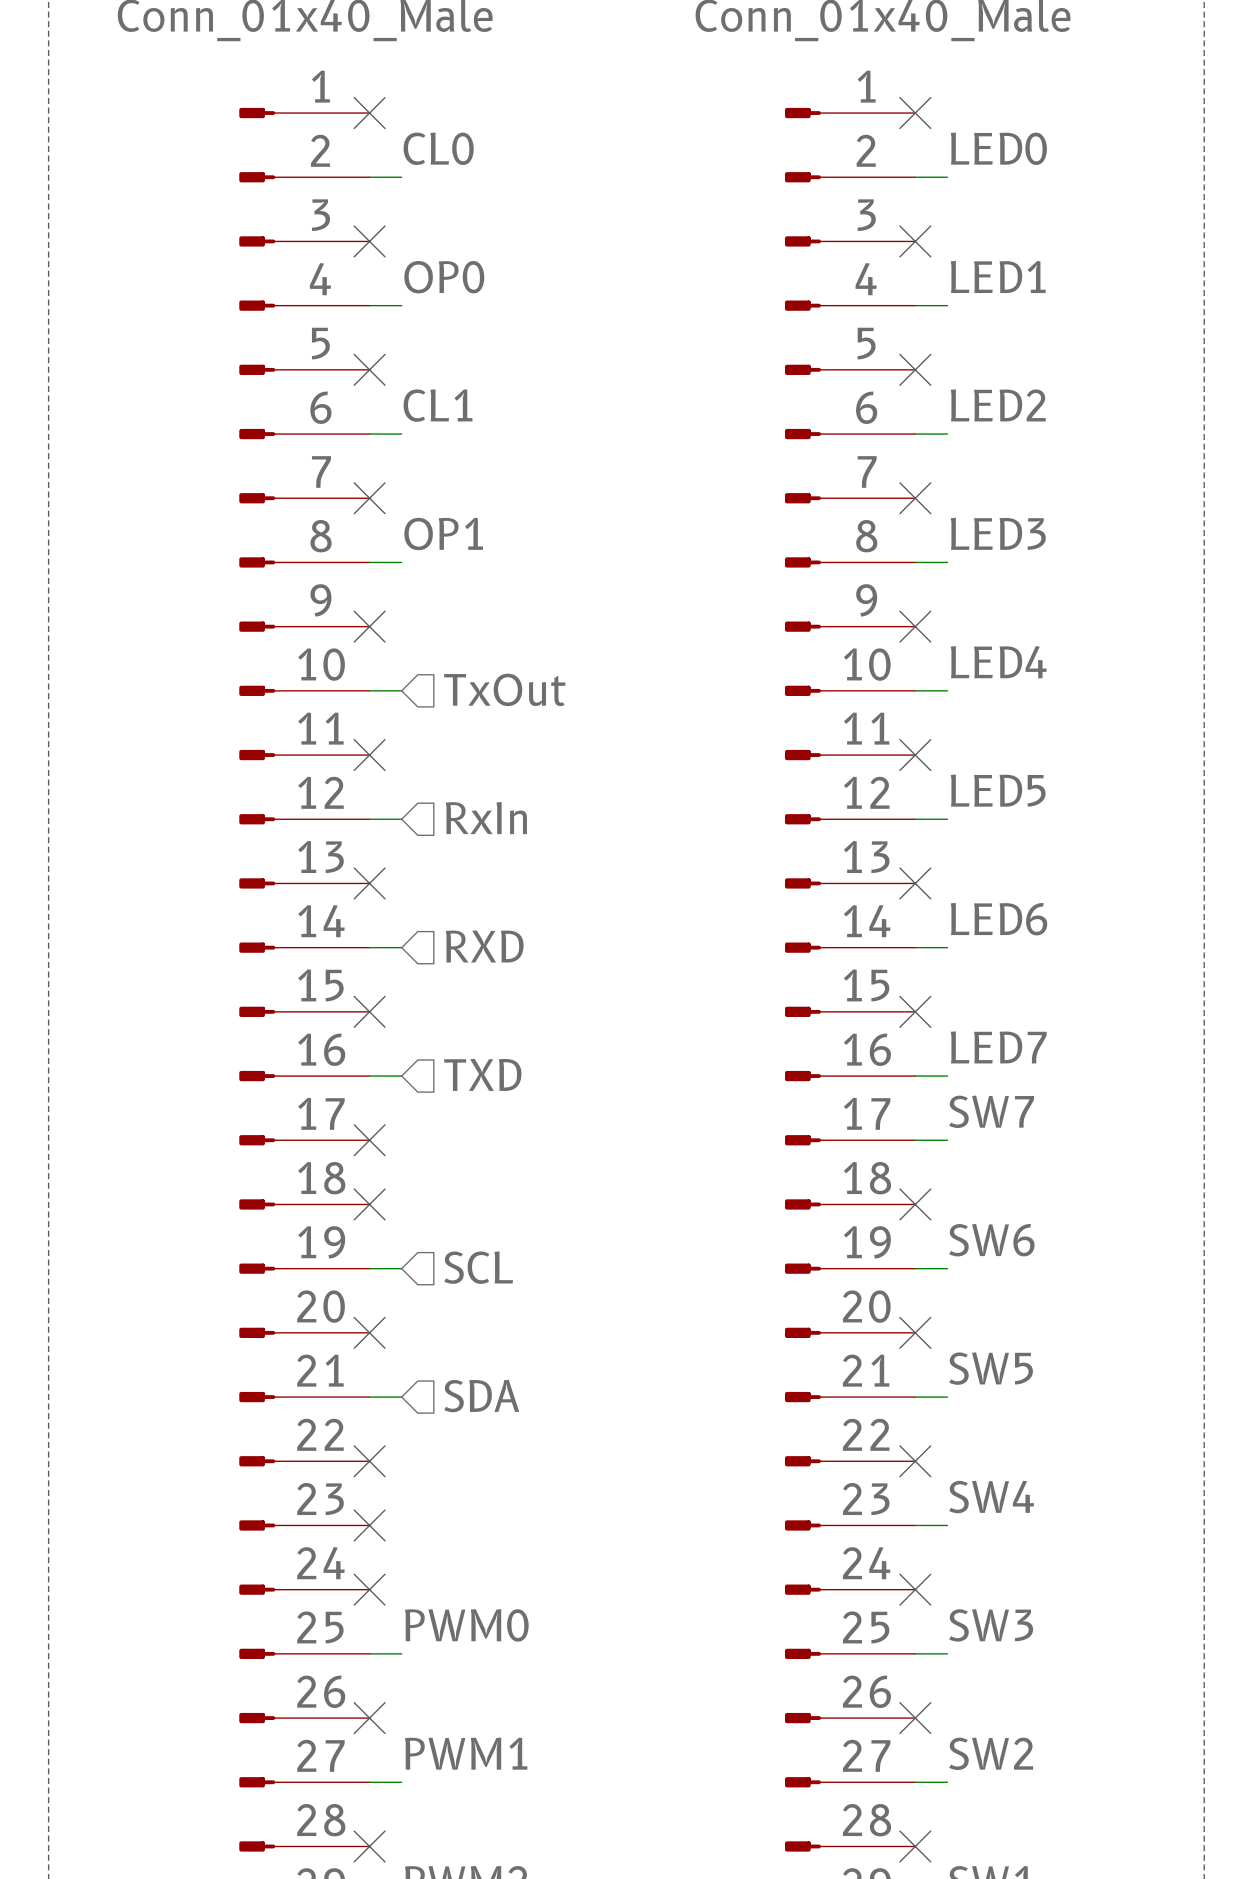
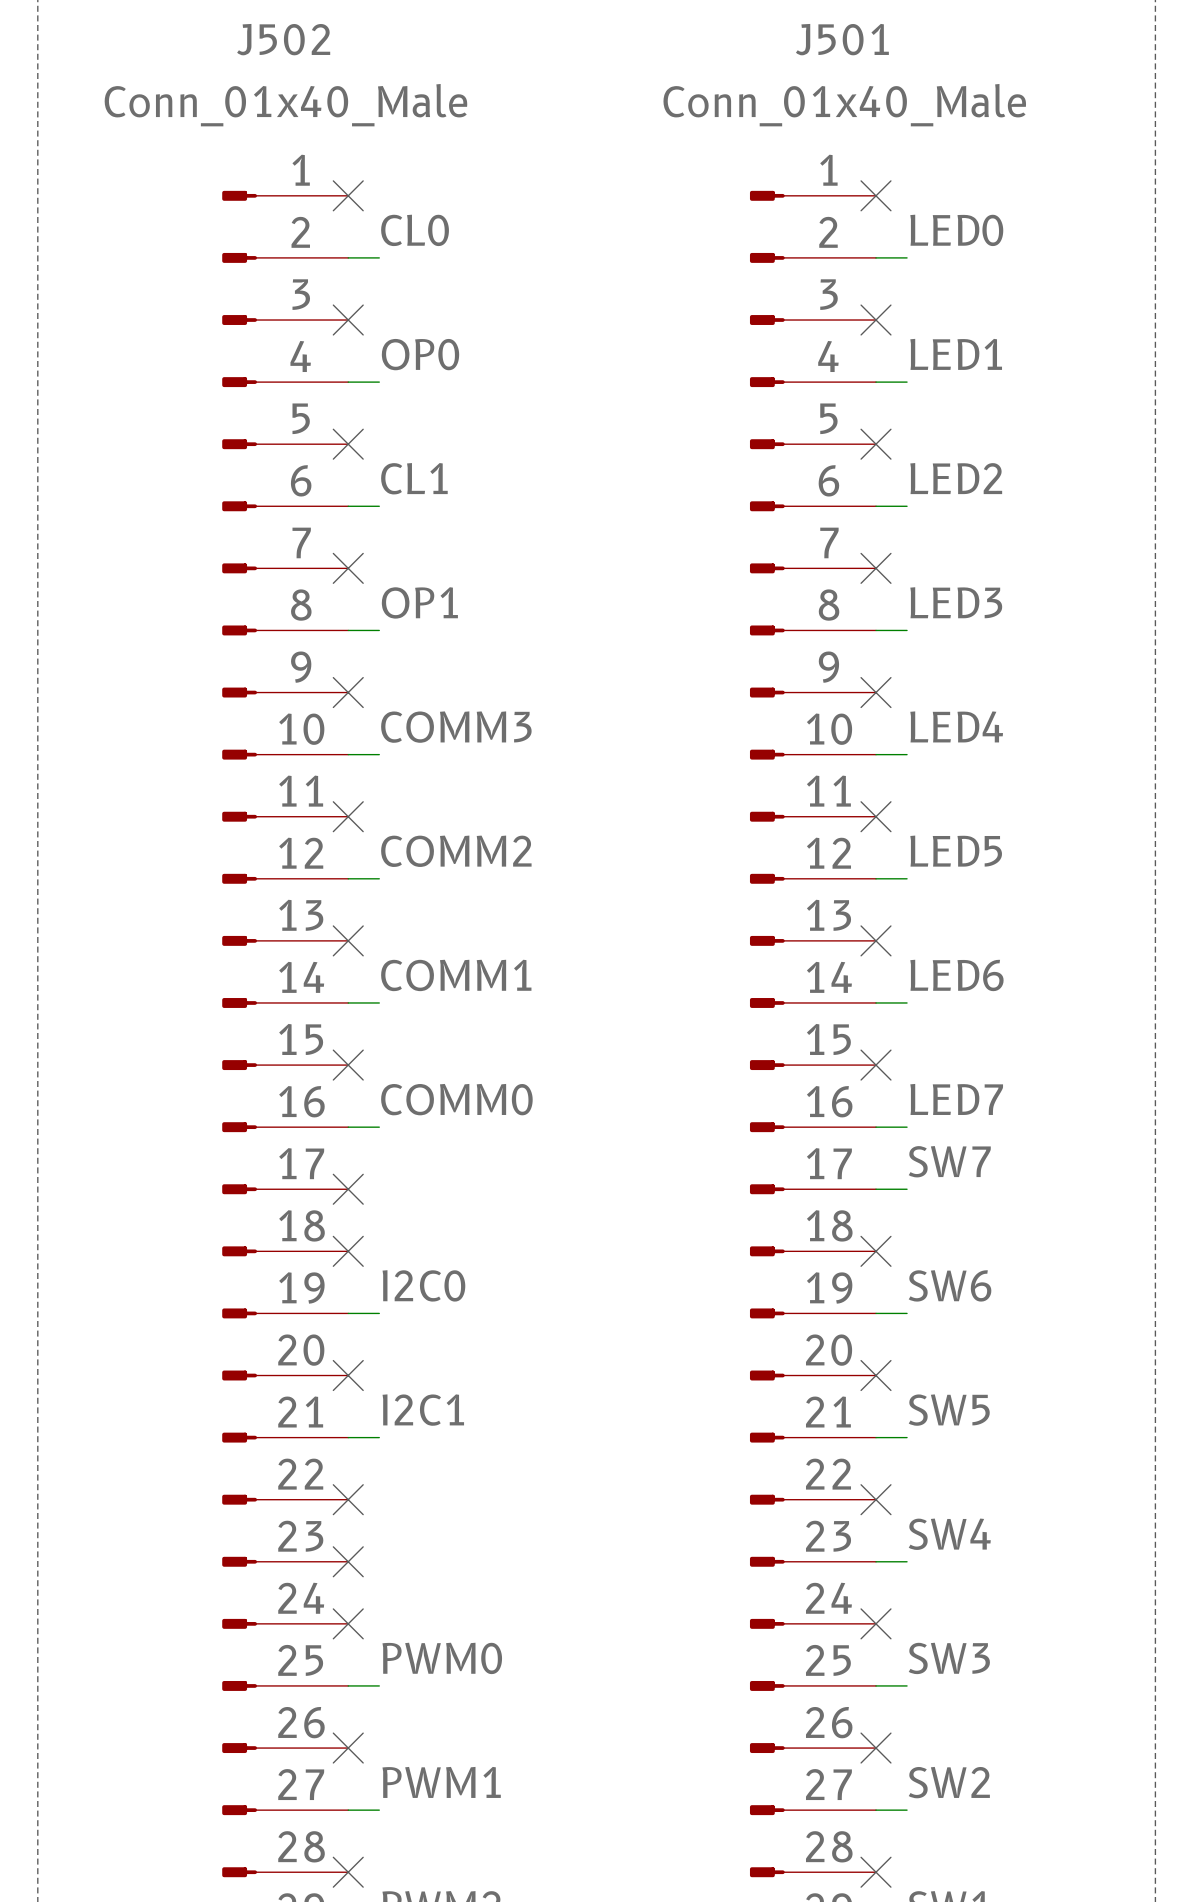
label: none -> COMM3 (456, 727)
hierarchical label: TxOut (504, 689) -> none
label: none -> COMM2 (456, 851)
hierarchical label: RxIn (486, 818) -> none
label: none -> COMM1 (456, 975)
hierarchical label: RXD (484, 946) -> none
label: none -> COMM0 (456, 1099)
hierarchical label: TXD (482, 1074) -> none
label: none -> I2C0 (423, 1285)
hierarchical label: SCL (478, 1267) -> none
label: none -> I2C1 (423, 1410)
hierarchical label: SDA (481, 1396) -> none

